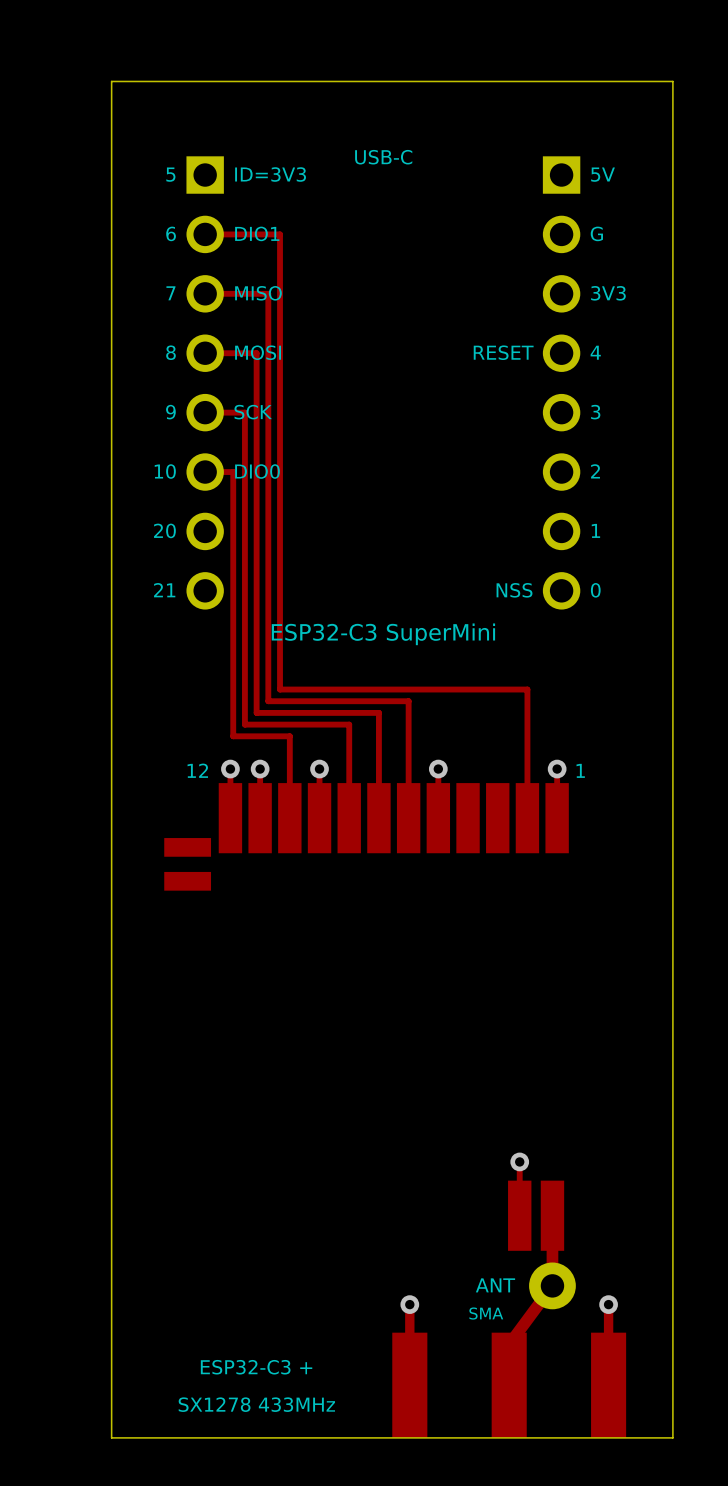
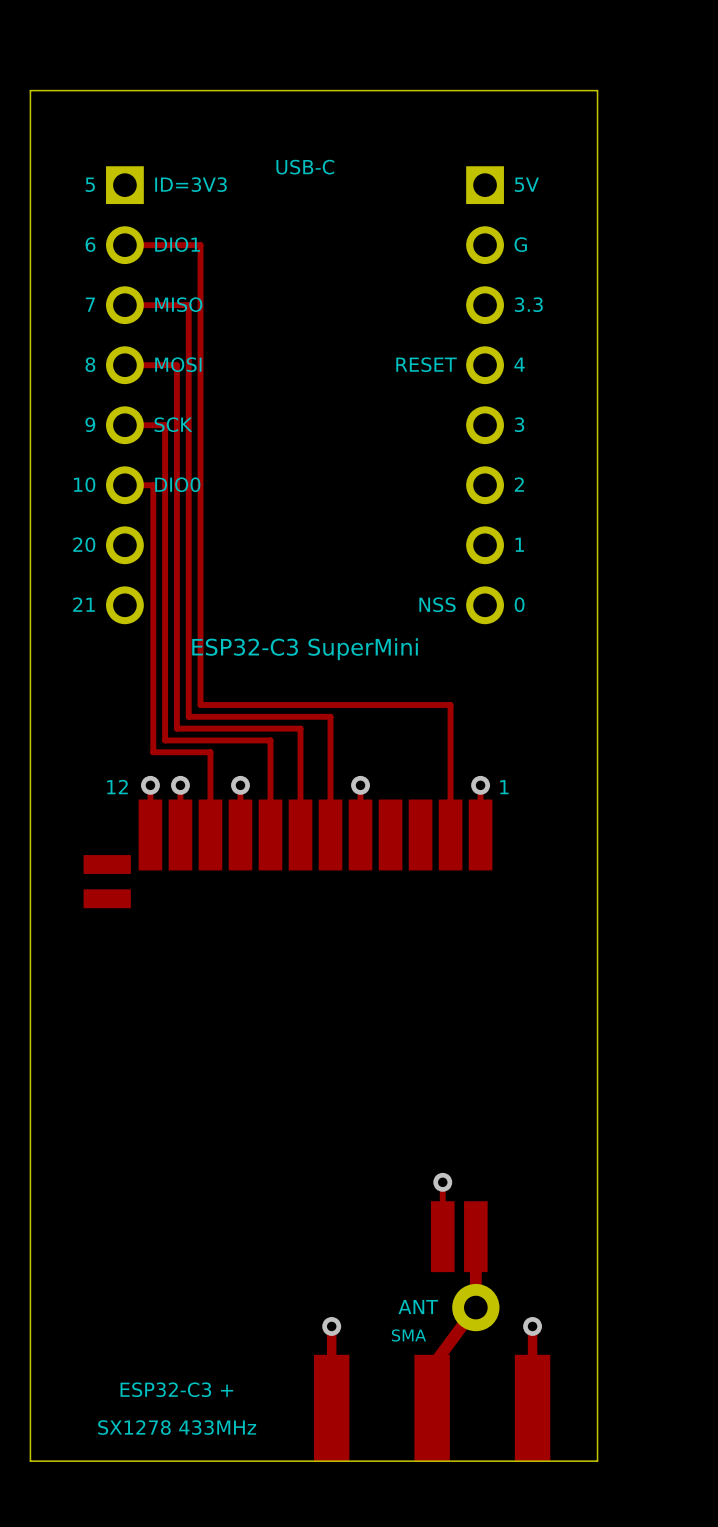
text: 3V3 (608, 293) -> 3.3 (528, 304)

